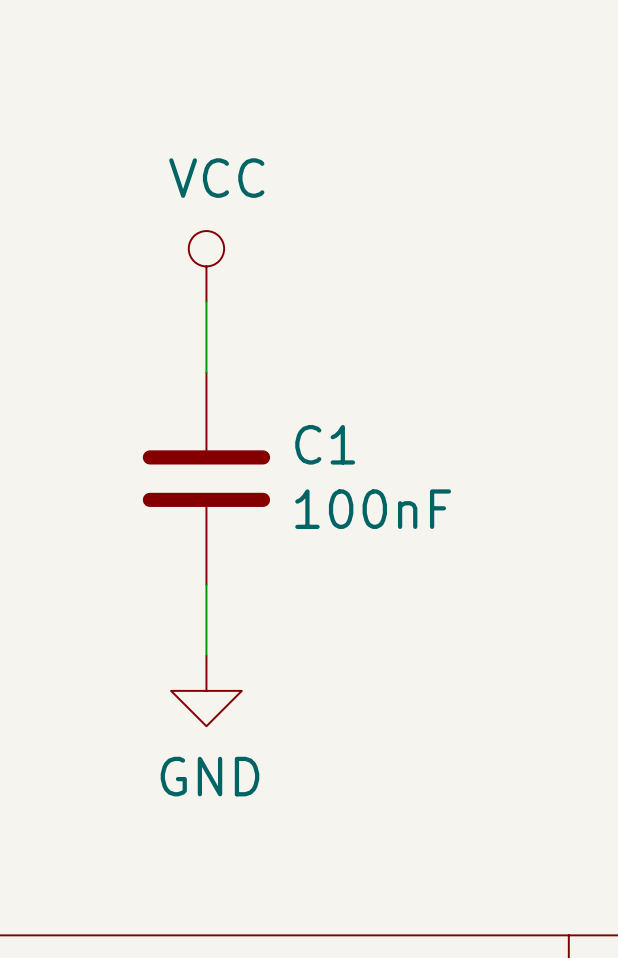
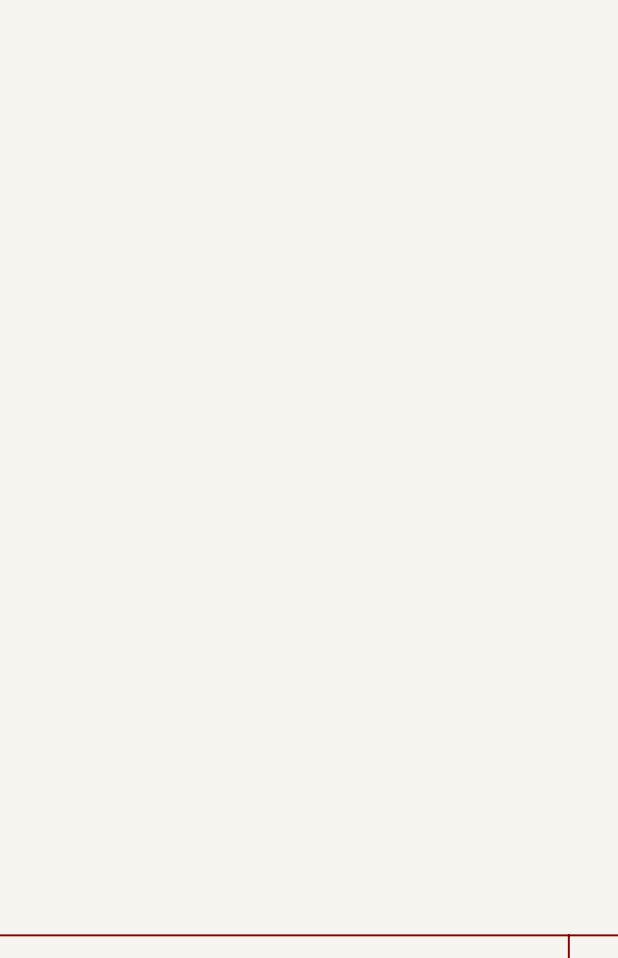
power symbol: VCC (206, 266) -> none
wire: (206, 301) (206, 372) -> none
C1: 100nF (206, 478) -> none
wire: (206, 584) (206, 655) -> none
power symbol: GND (206, 690) -> none

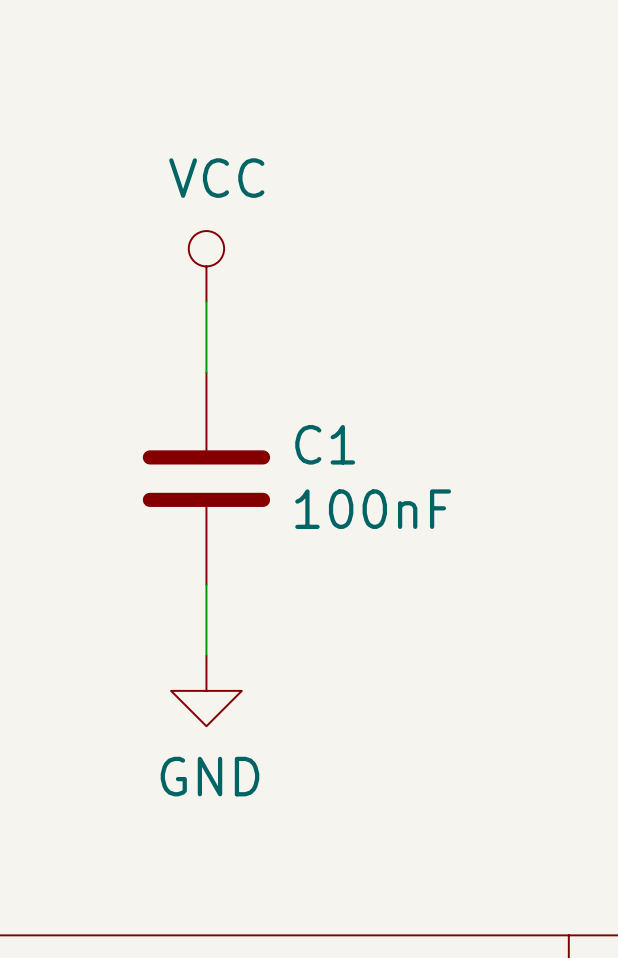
power symbol: none -> VCC (206, 266)
wire: none -> (206, 301) (206, 372)
C1: none -> 100nF (206, 478)
wire: none -> (206, 584) (206, 655)
power symbol: none -> GND (206, 690)

